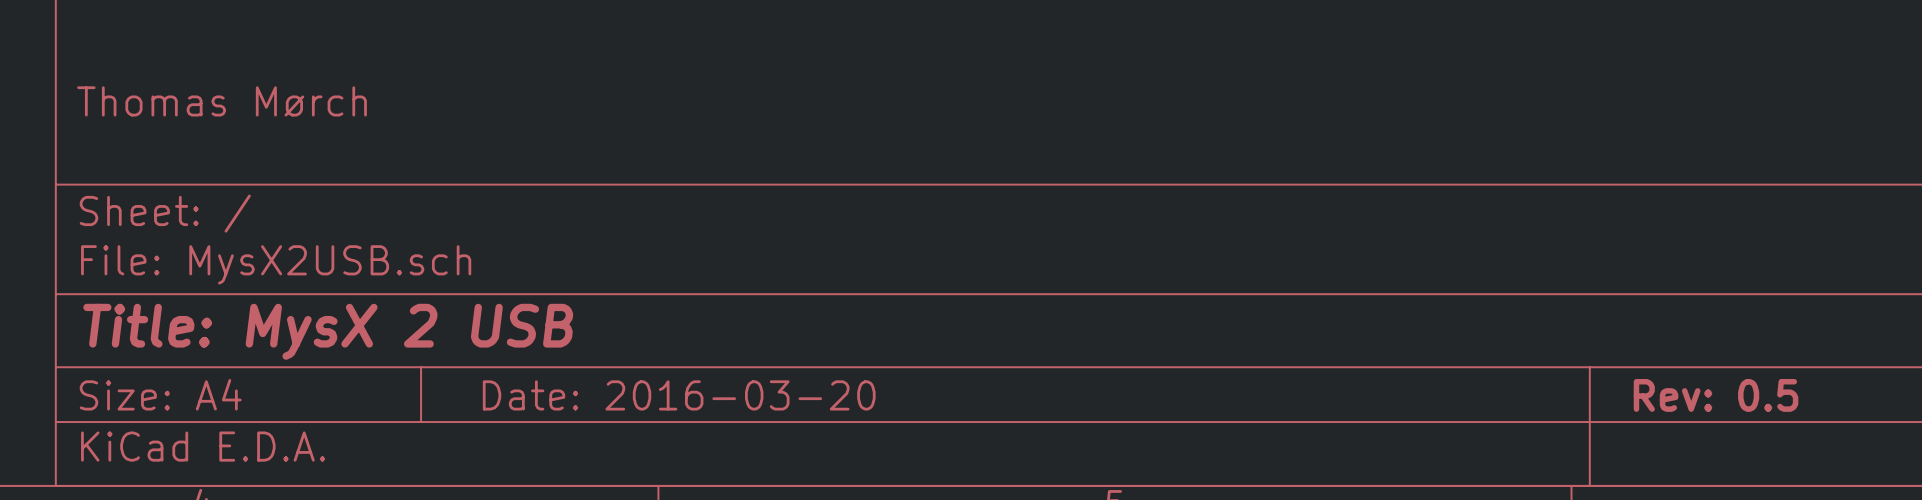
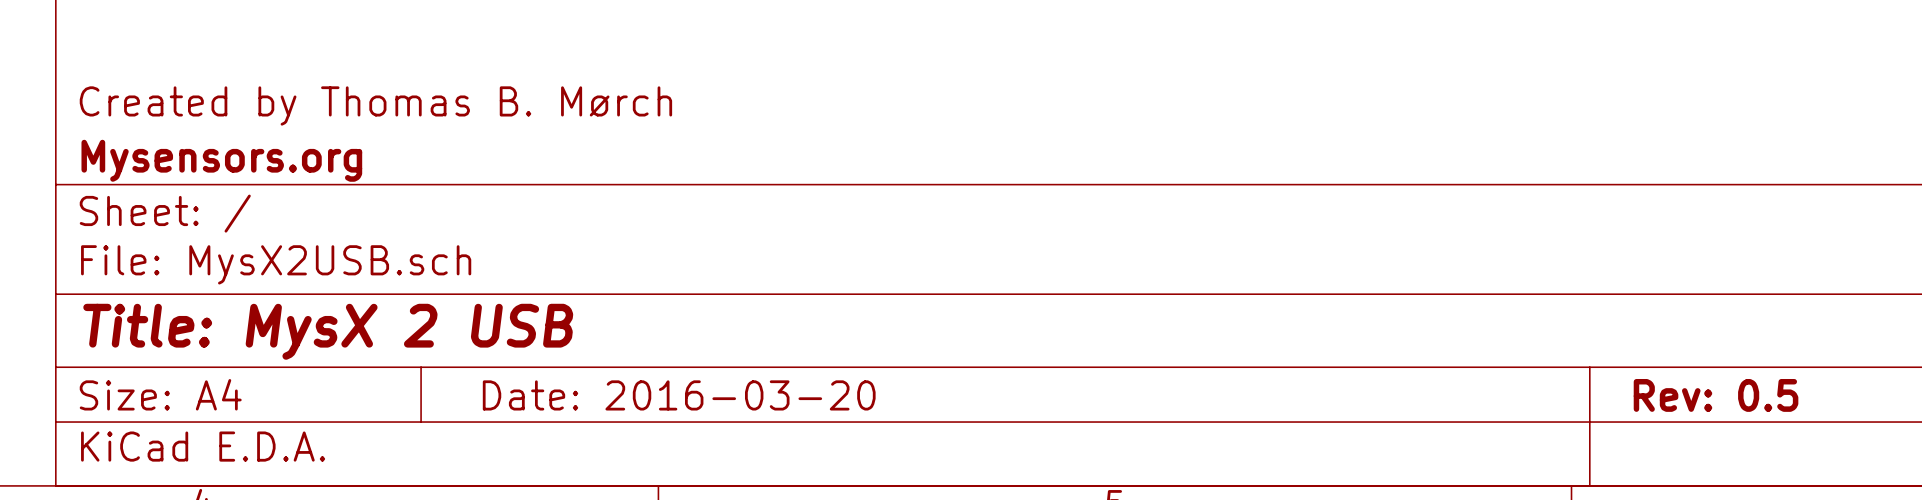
title block: Thomas Mørch (222, 101) -> Created by Thomas B. Mørch (375, 105)
title block: none -> Mysensors.org (221, 160)

